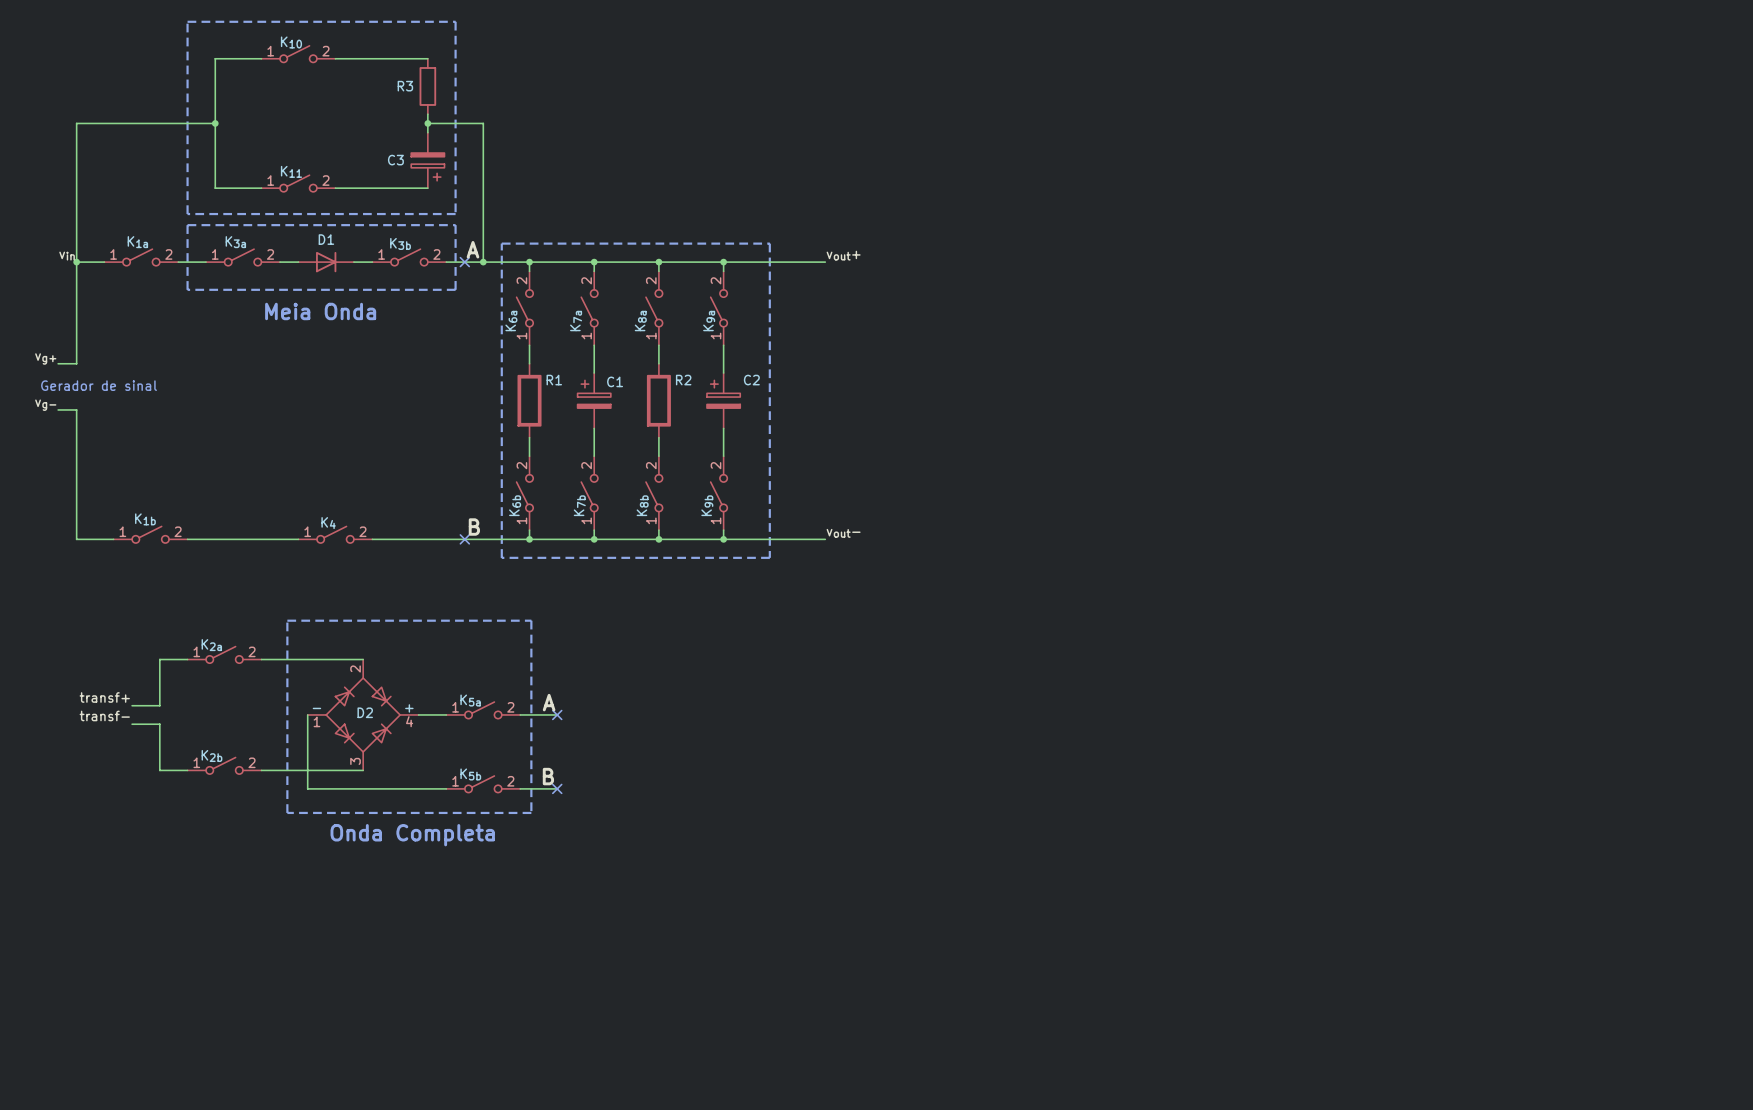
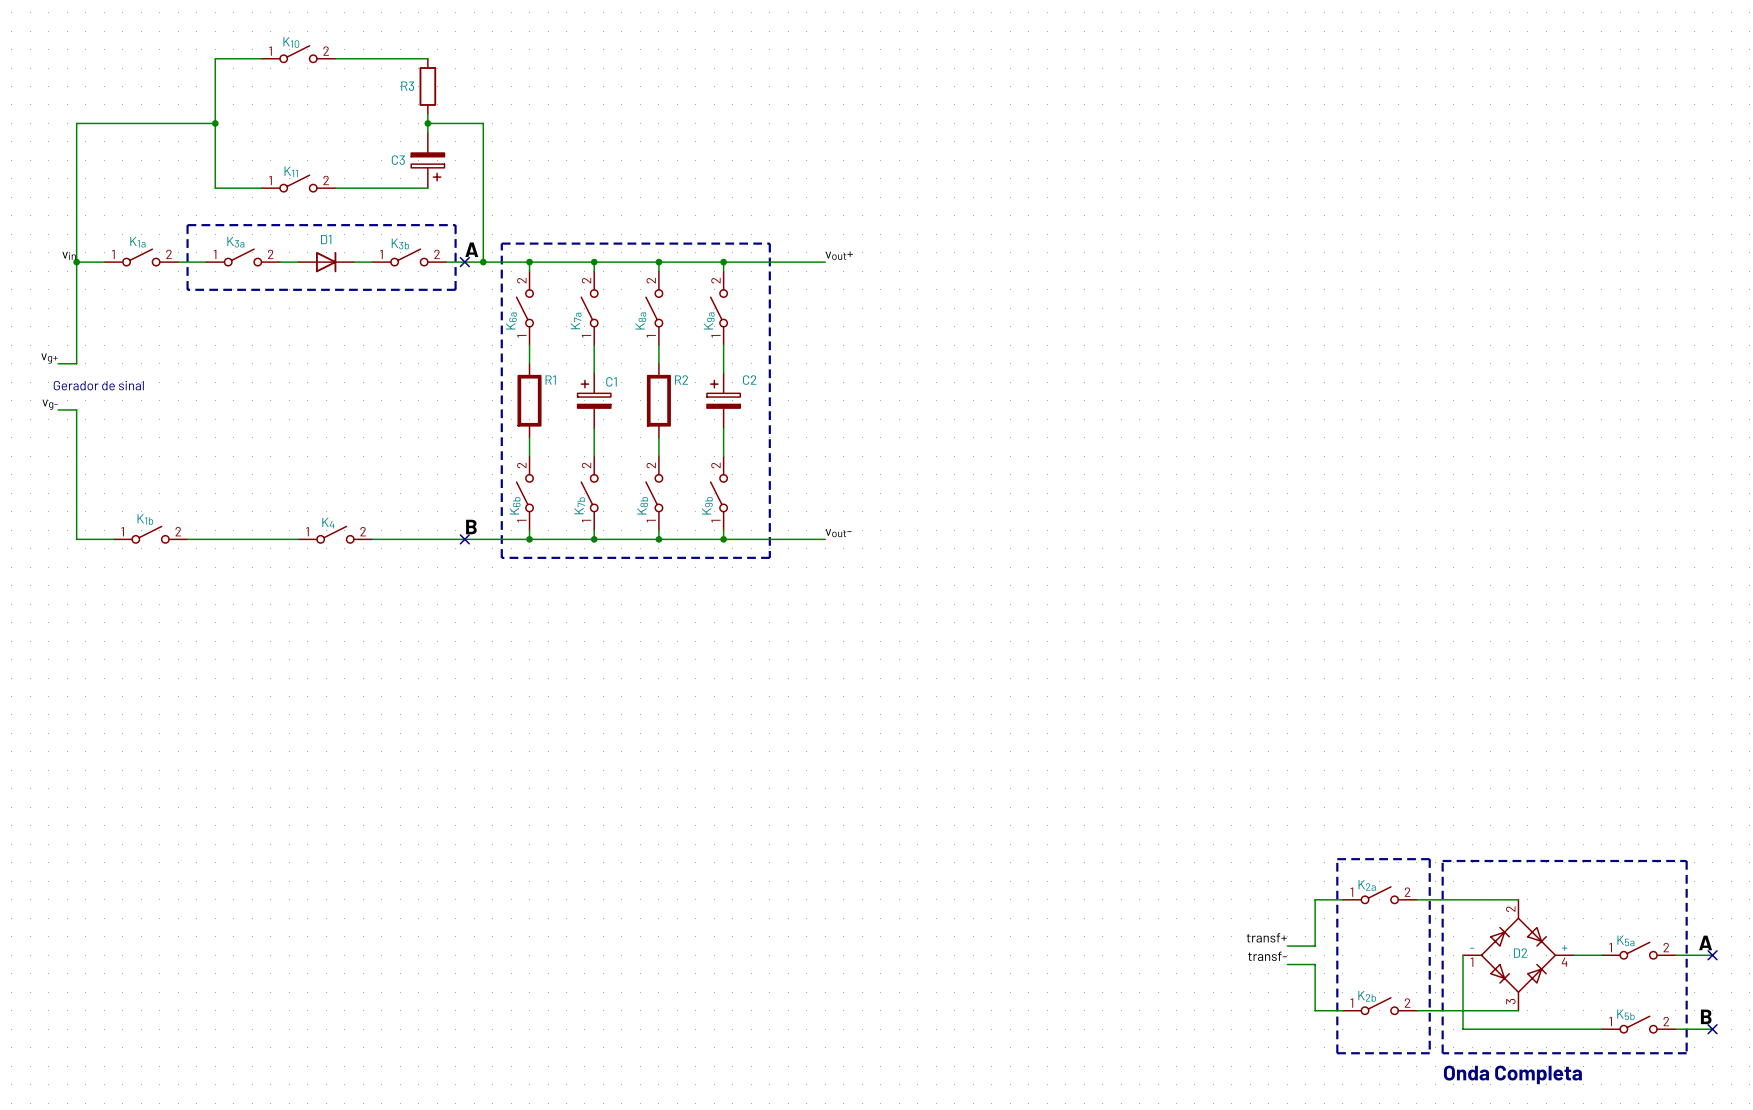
line: (187, 21) (187, 214) (455, 214) (455, 21) (187, 21) -> none
text: Meia Onda (320, 311) -> none
line: (287, 620) (531, 620) (531, 812) (287, 812) (287, 620) -> none
K2a position: (224, 654) -> (1379, 895)
wire: (187, 659) (159, 659) (159, 705) (132, 705) -> none
wire: (261, 659) (363, 659) -> none
label: transf+ (104, 697) -> none
label: A (549, 702) -> none
K5a position: (483, 710) -> (1638, 950)
wire: (307, 714) (307, 788) (446, 788) -> none
D2 position: (363, 714) -> (1518, 955)
wire: (418, 714) (446, 714) -> none
wire: (520, 714) (557, 714) -> none
no-connect mark: (557, 714) -> none
label: transf- (104, 715) -> none
wire: (132, 724) (159, 724) (159, 770) (187, 770) -> none
K2b position: (224, 765) -> (1379, 1006)
wire: (261, 770) (363, 770) -> none
label: B (548, 776) -> none
K5b position: (483, 784) -> (1638, 1024)
wire: (520, 788) (557, 788) -> none
no-connect mark: (557, 788) -> none
text: Onda Completa (412, 835) -> none
line: none -> (1337, 859) (1429, 859) (1429, 1053) (1337, 1053) (1337, 859)
line: none -> (1442, 861) (1686, 861) (1686, 1053) (1442, 1053) (1442, 861)
wire: none -> (1342, 899) (1315, 899) (1315, 946) (1287, 946)
wire: none -> (1416, 899) (1518, 899)
label: none -> transf+ (1266, 937)
label: none -> A (1705, 942)
wire: none -> (1463, 955) (1463, 1029) (1601, 1029)
wire: none -> (1573, 955) (1601, 955)
wire: none -> (1675, 955) (1712, 955)
no-connect mark: none -> (1712, 955)
label: none -> transf- (1267, 956)
wire: none -> (1287, 964) (1315, 964) (1315, 1010) (1342, 1010)
wire: none -> (1416, 1010) (1518, 1010)
label: none -> B (1706, 1016)
wire: none -> (1675, 1029) (1712, 1029)
no-connect mark: none -> (1712, 1029)
text: none -> Onda Completa (1512, 1074)

